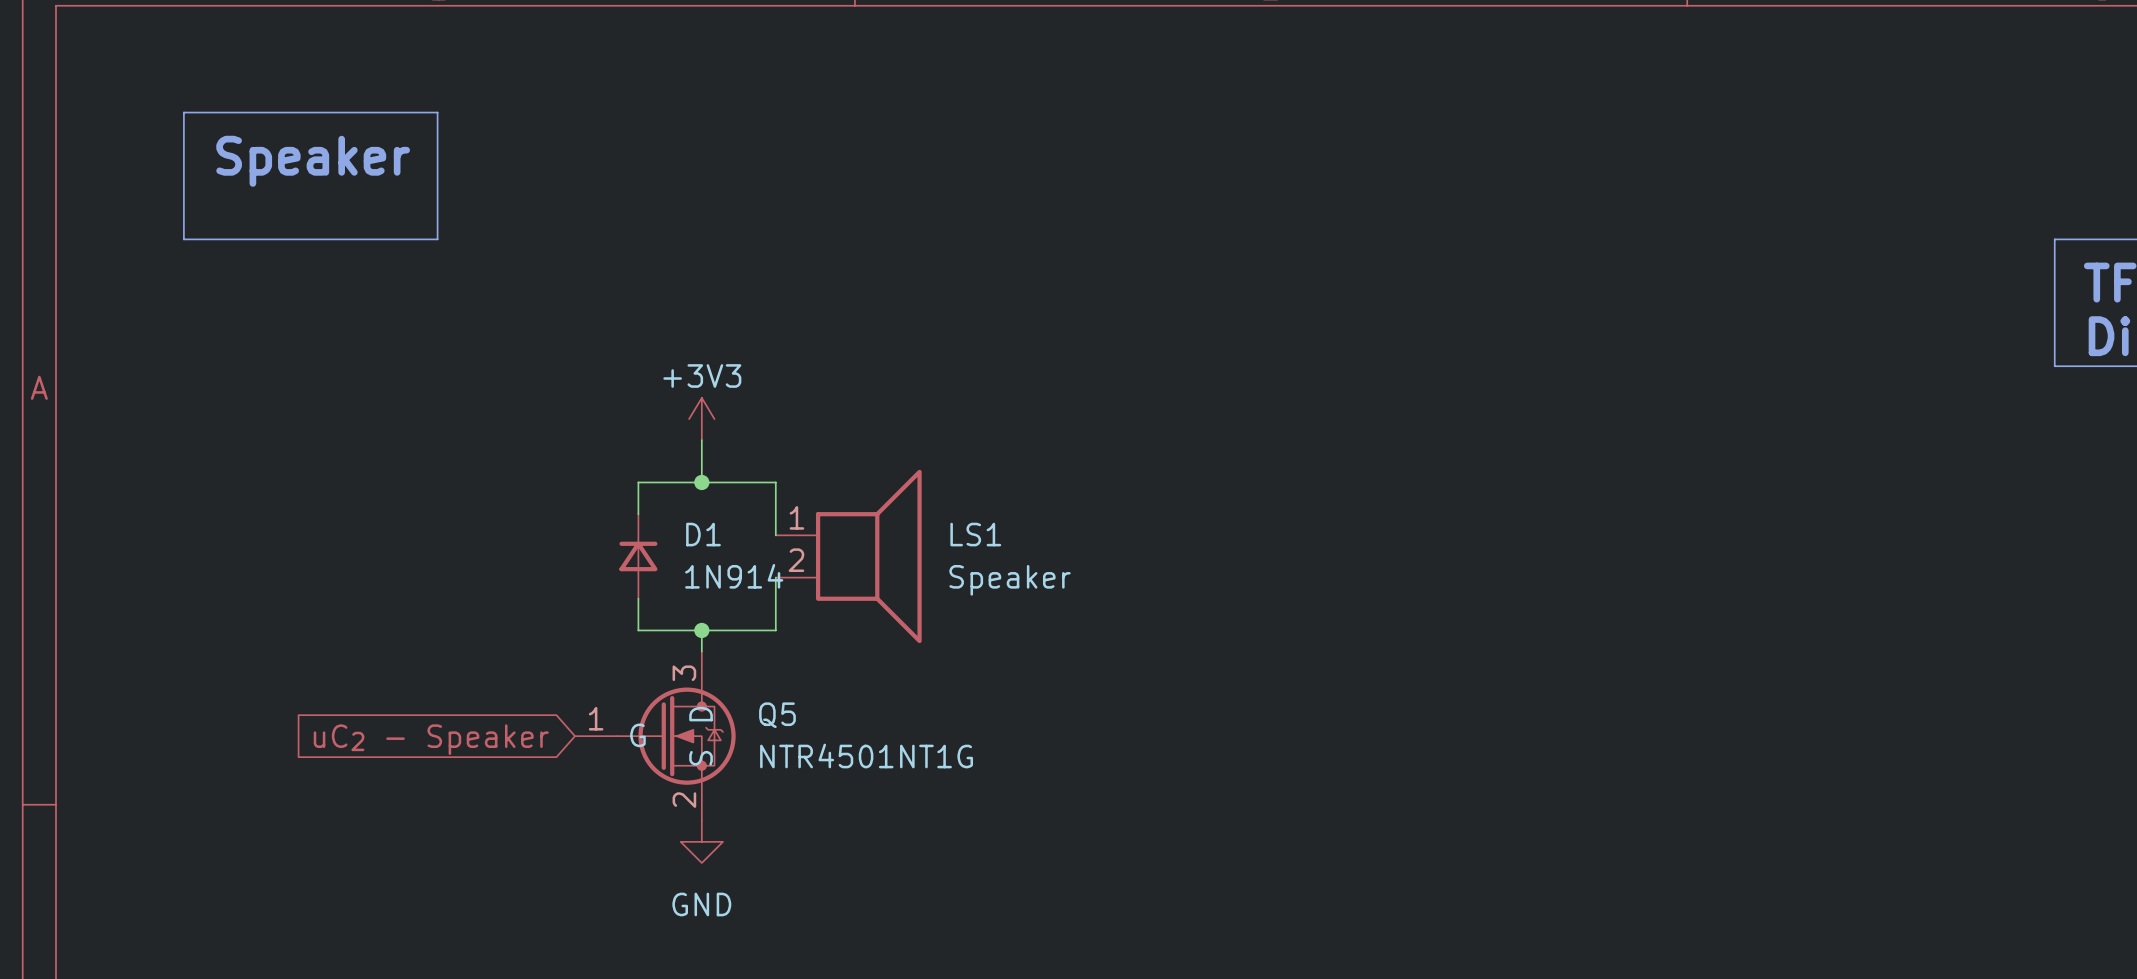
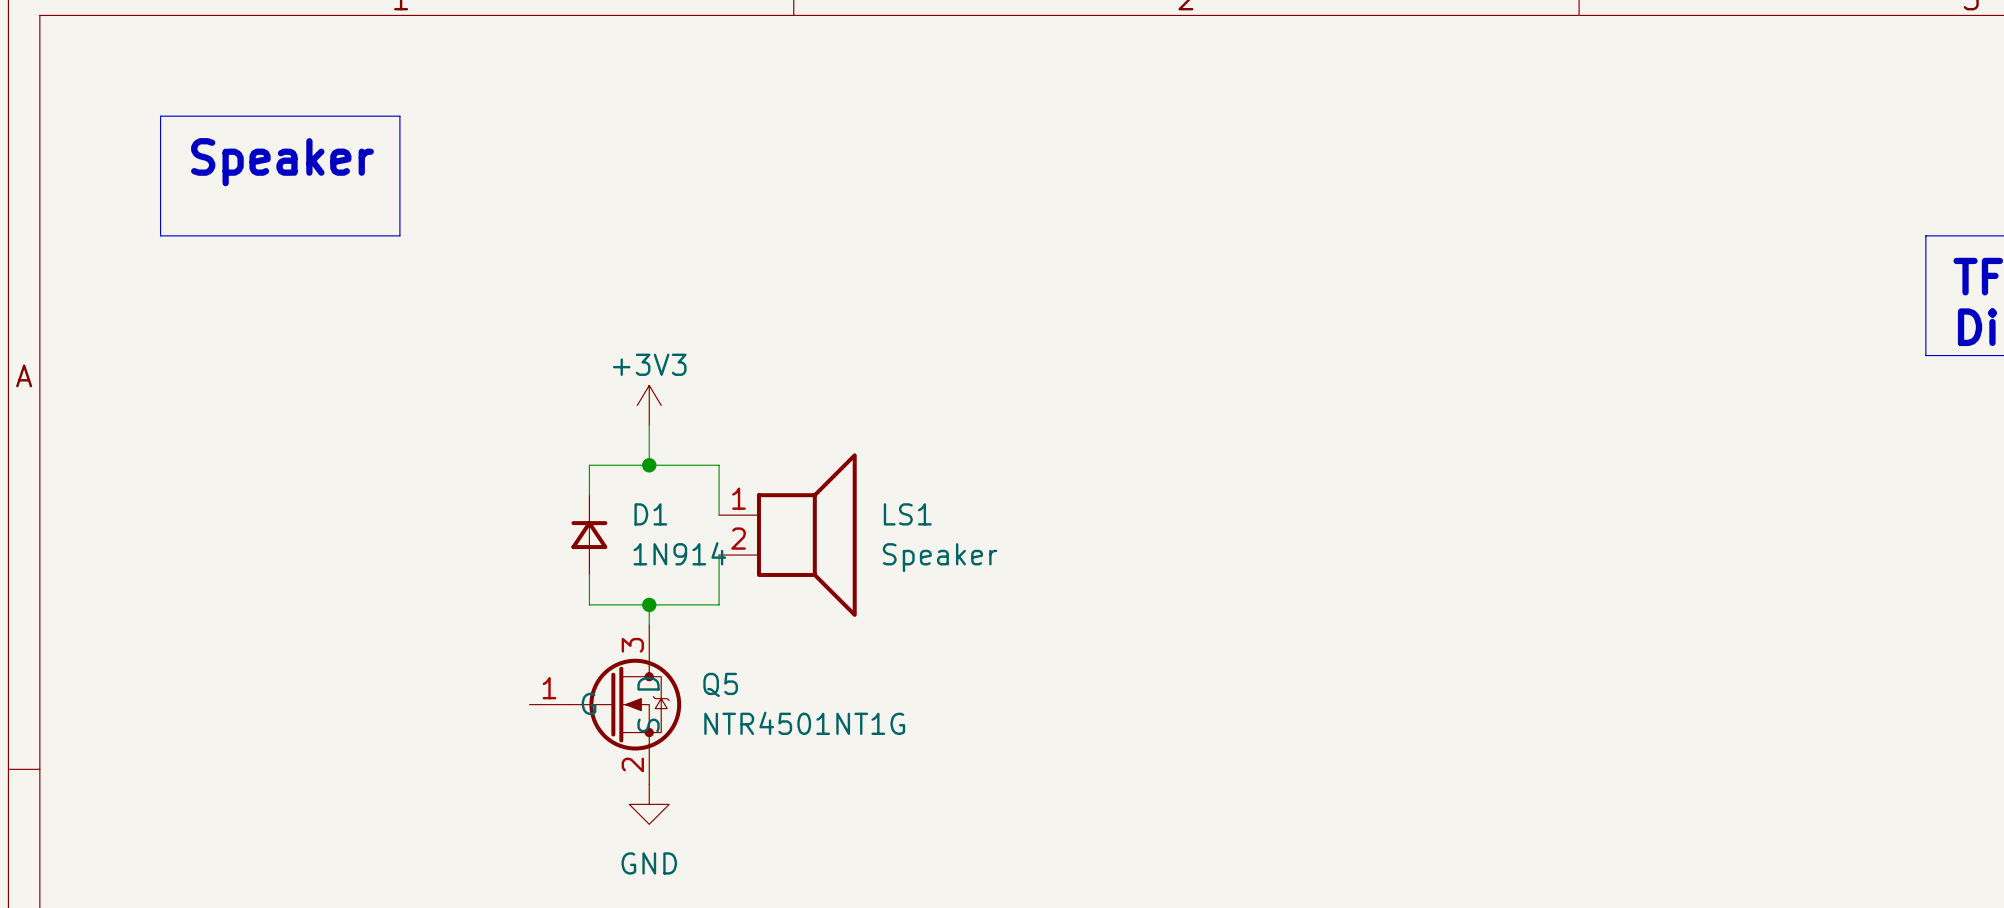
global label: uC2 - Speaker (431, 739) -> none

